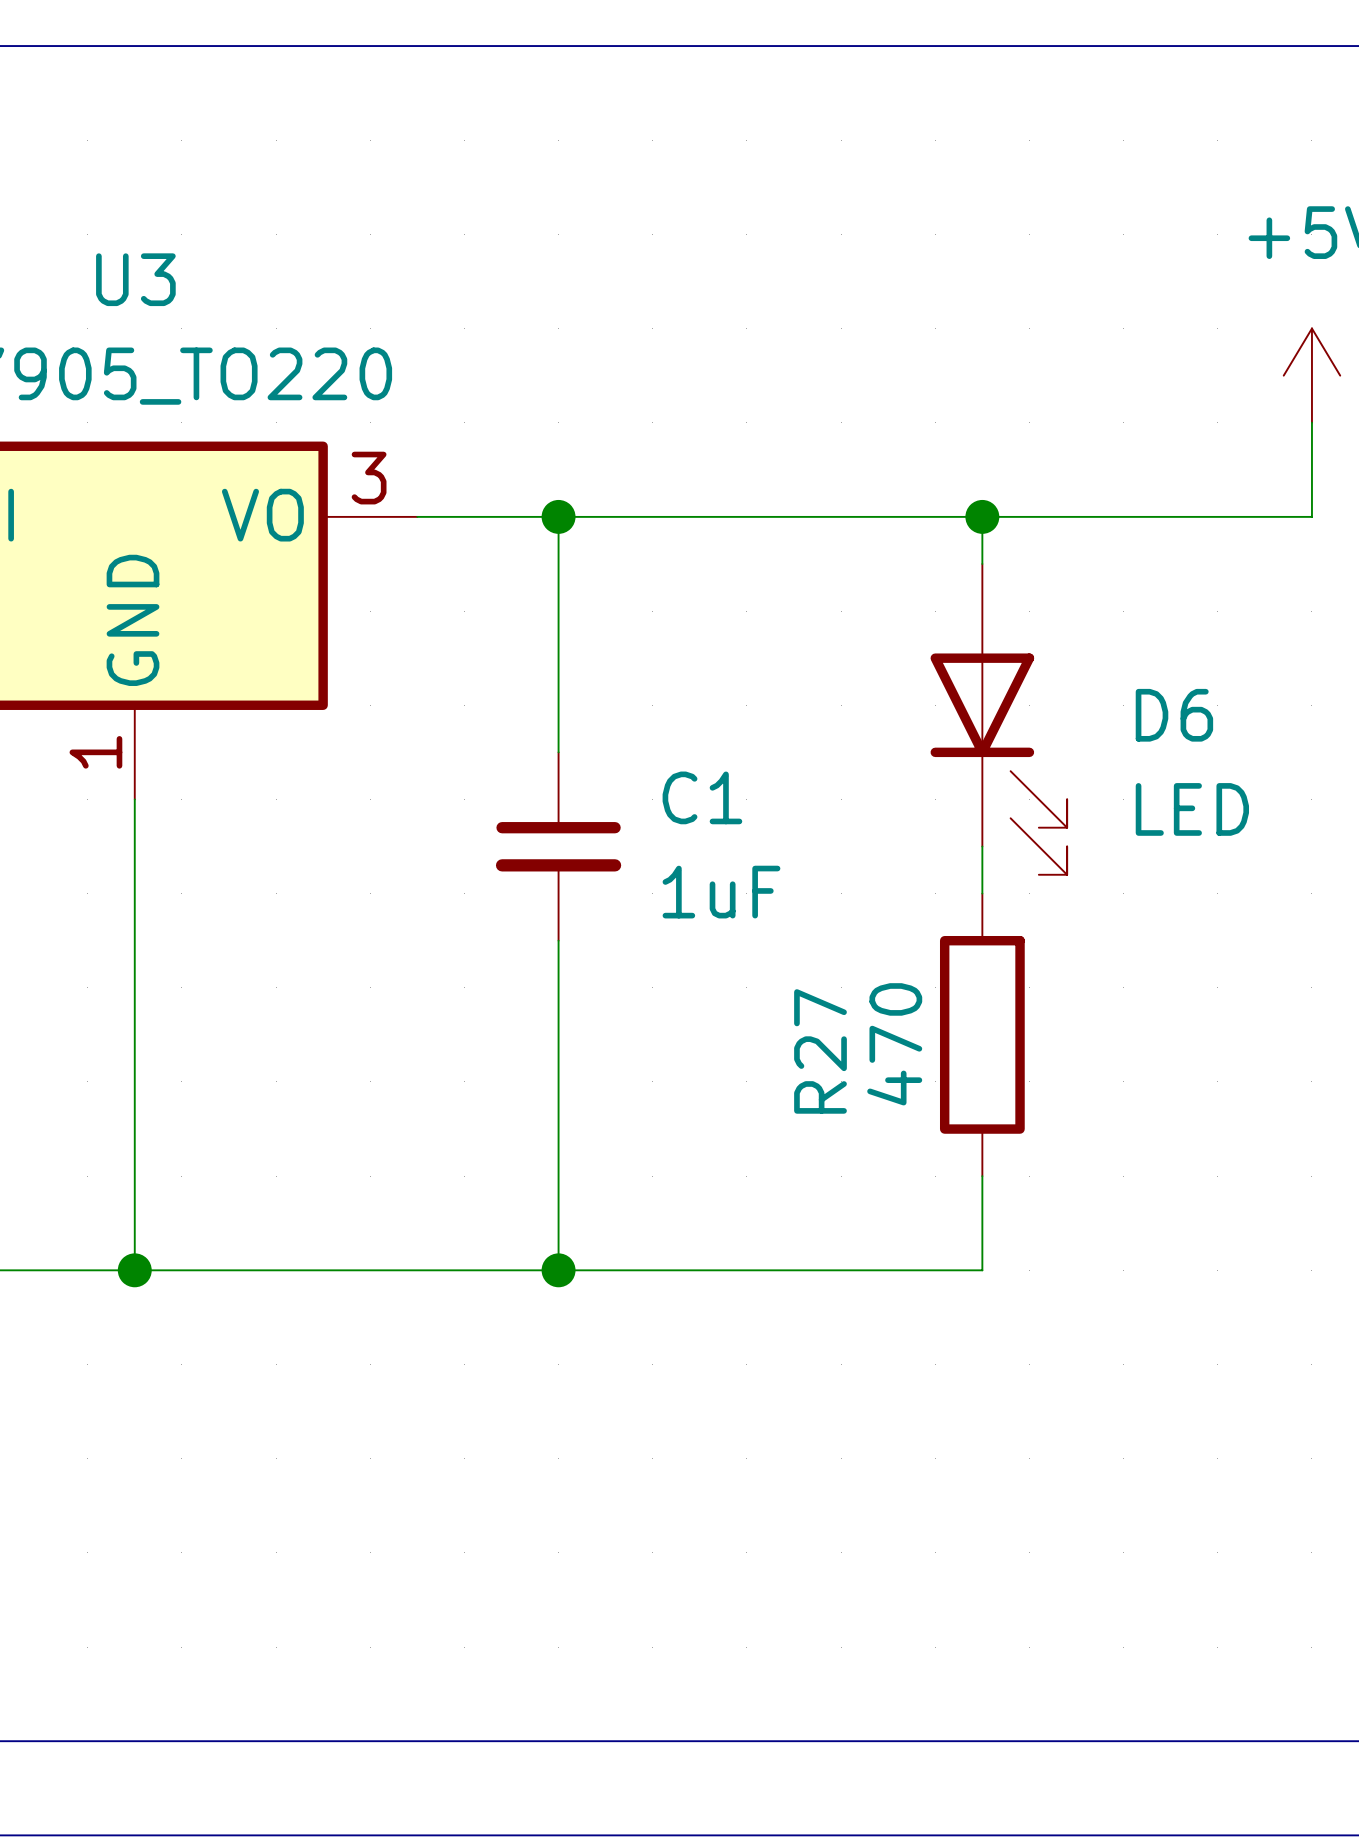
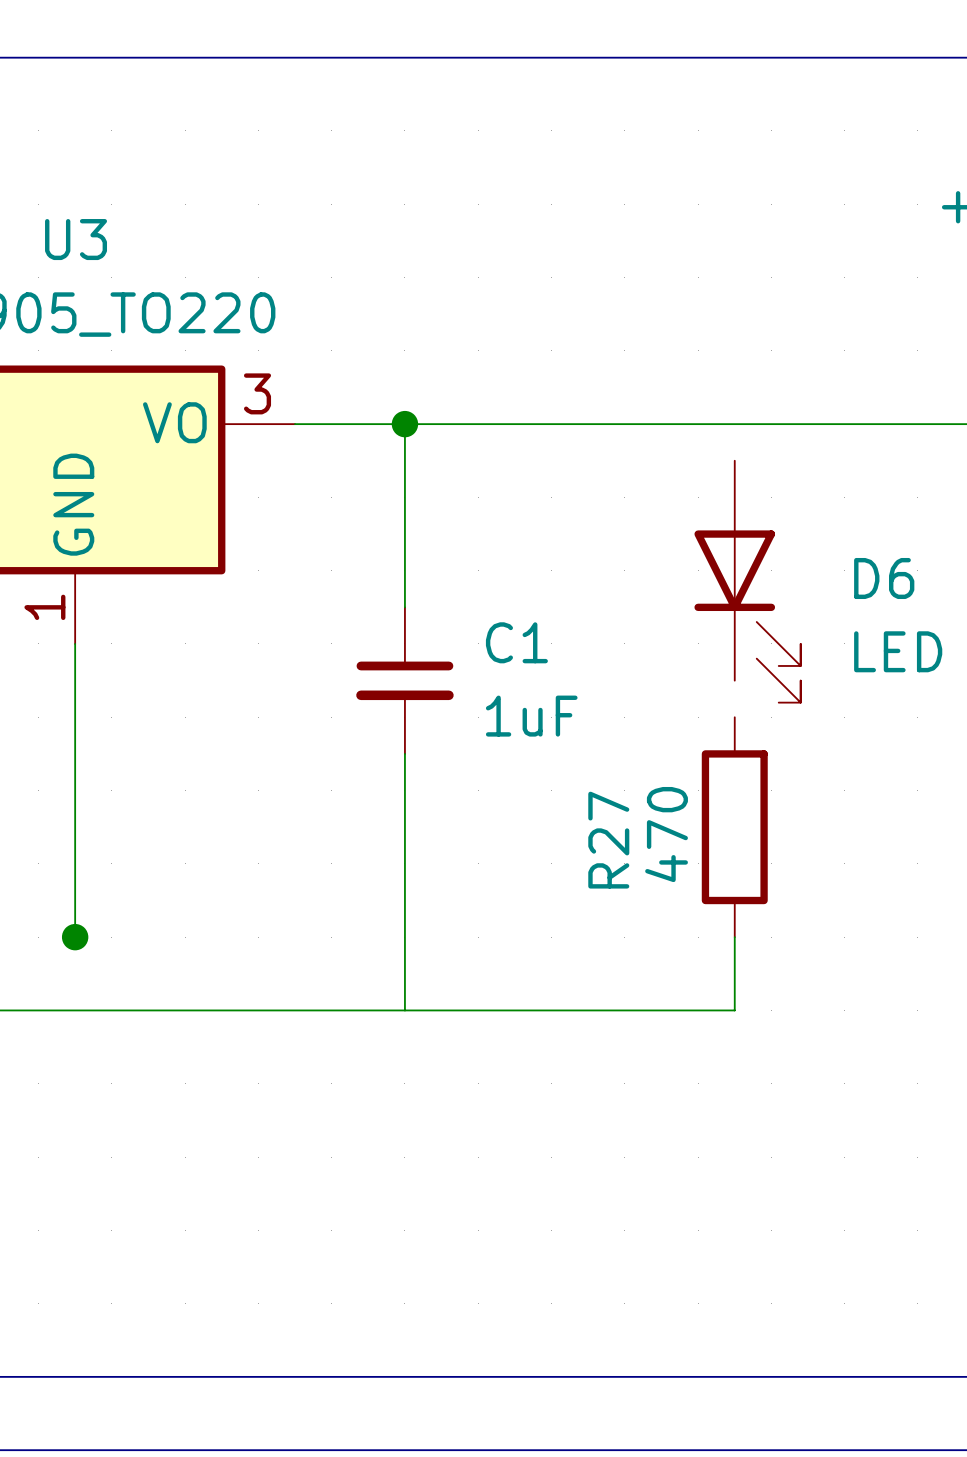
wire: (982, 516) (982, 563) -> none
junction: (982, 516) -> none
wire: (982, 846) (982, 893) -> none
wire: (134, 1176) (134, 1270) -> none
junction position: (134, 1270) -> (75, 937)
junction: (558, 1270) -> none

